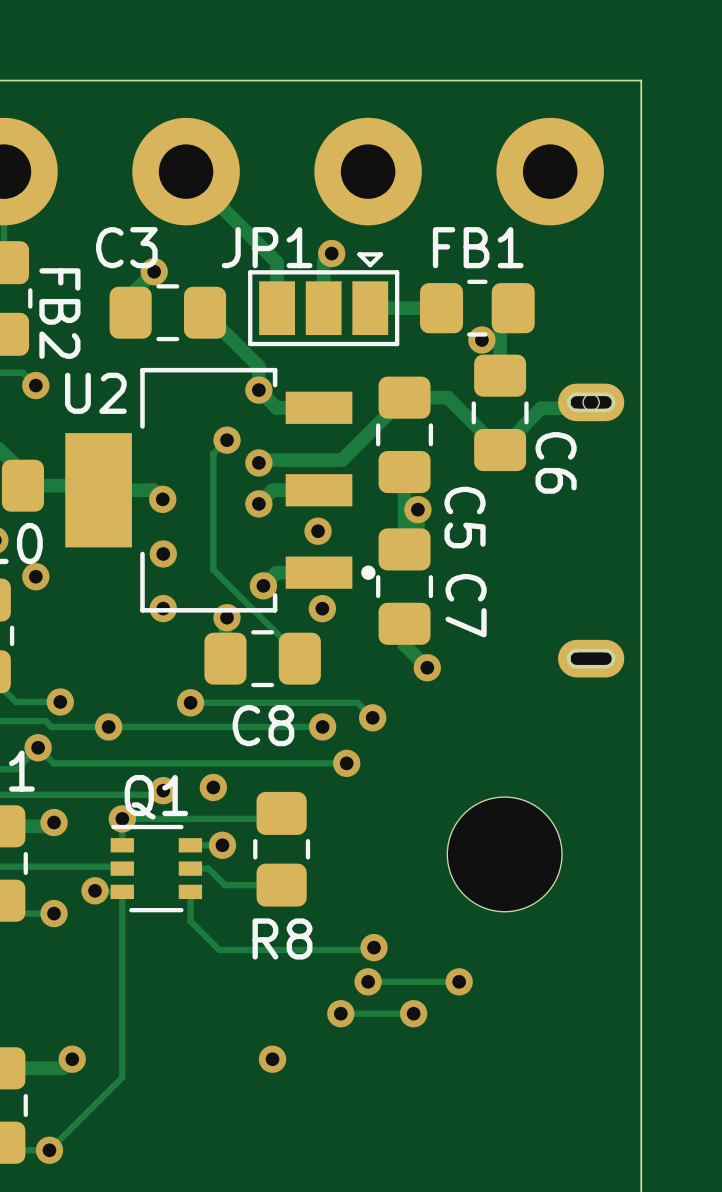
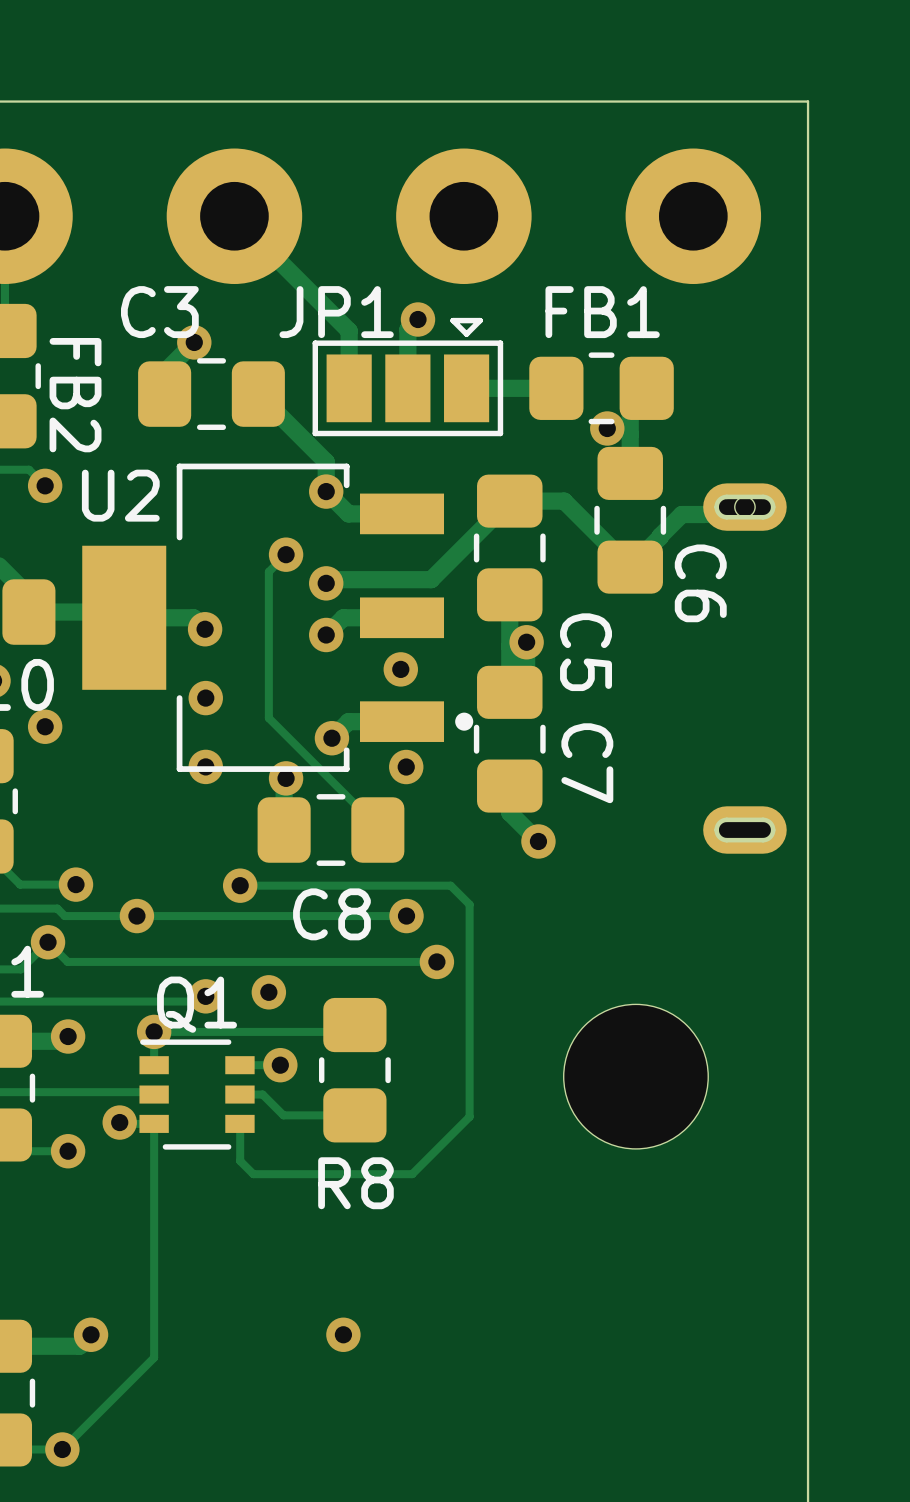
via: (372, 717) -> none
track: (201, 931) (219, 949) (371, 949) (374, 947) -> (253, 1174) (412, 1174) (469, 1116) (469, 904)
via: (374, 947) -> none
via: (368, 981) -> none
track: (459, 981) (368, 981) -> none
via: (459, 981) -> none
via: (340, 1013) -> none
track: (413, 1013) (340, 1013) -> none
via: (413, 1013) -> none

